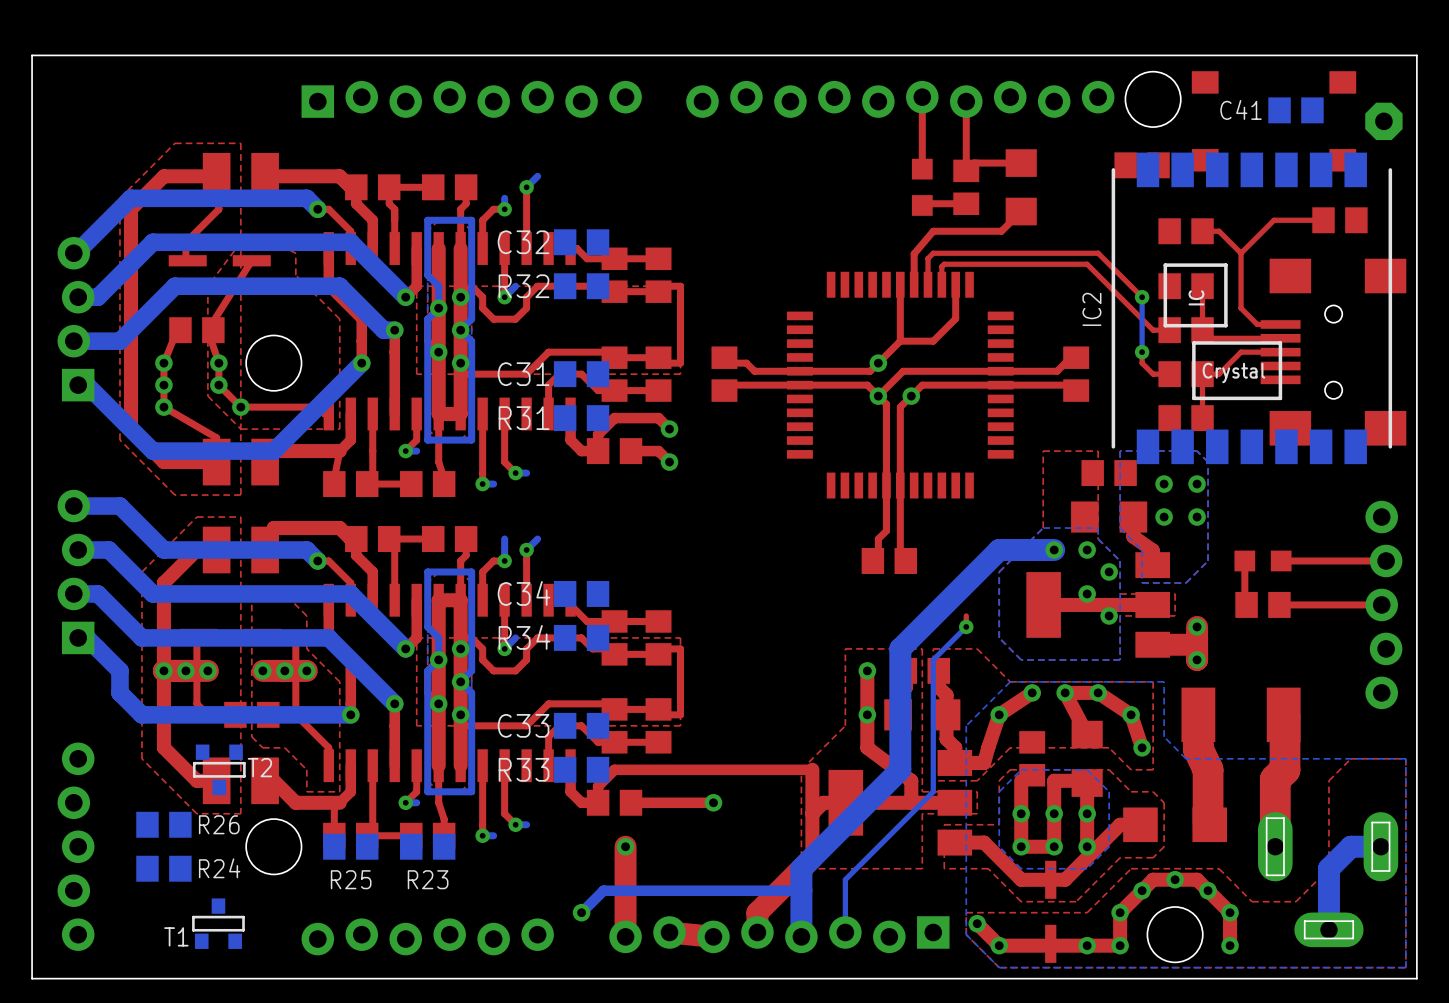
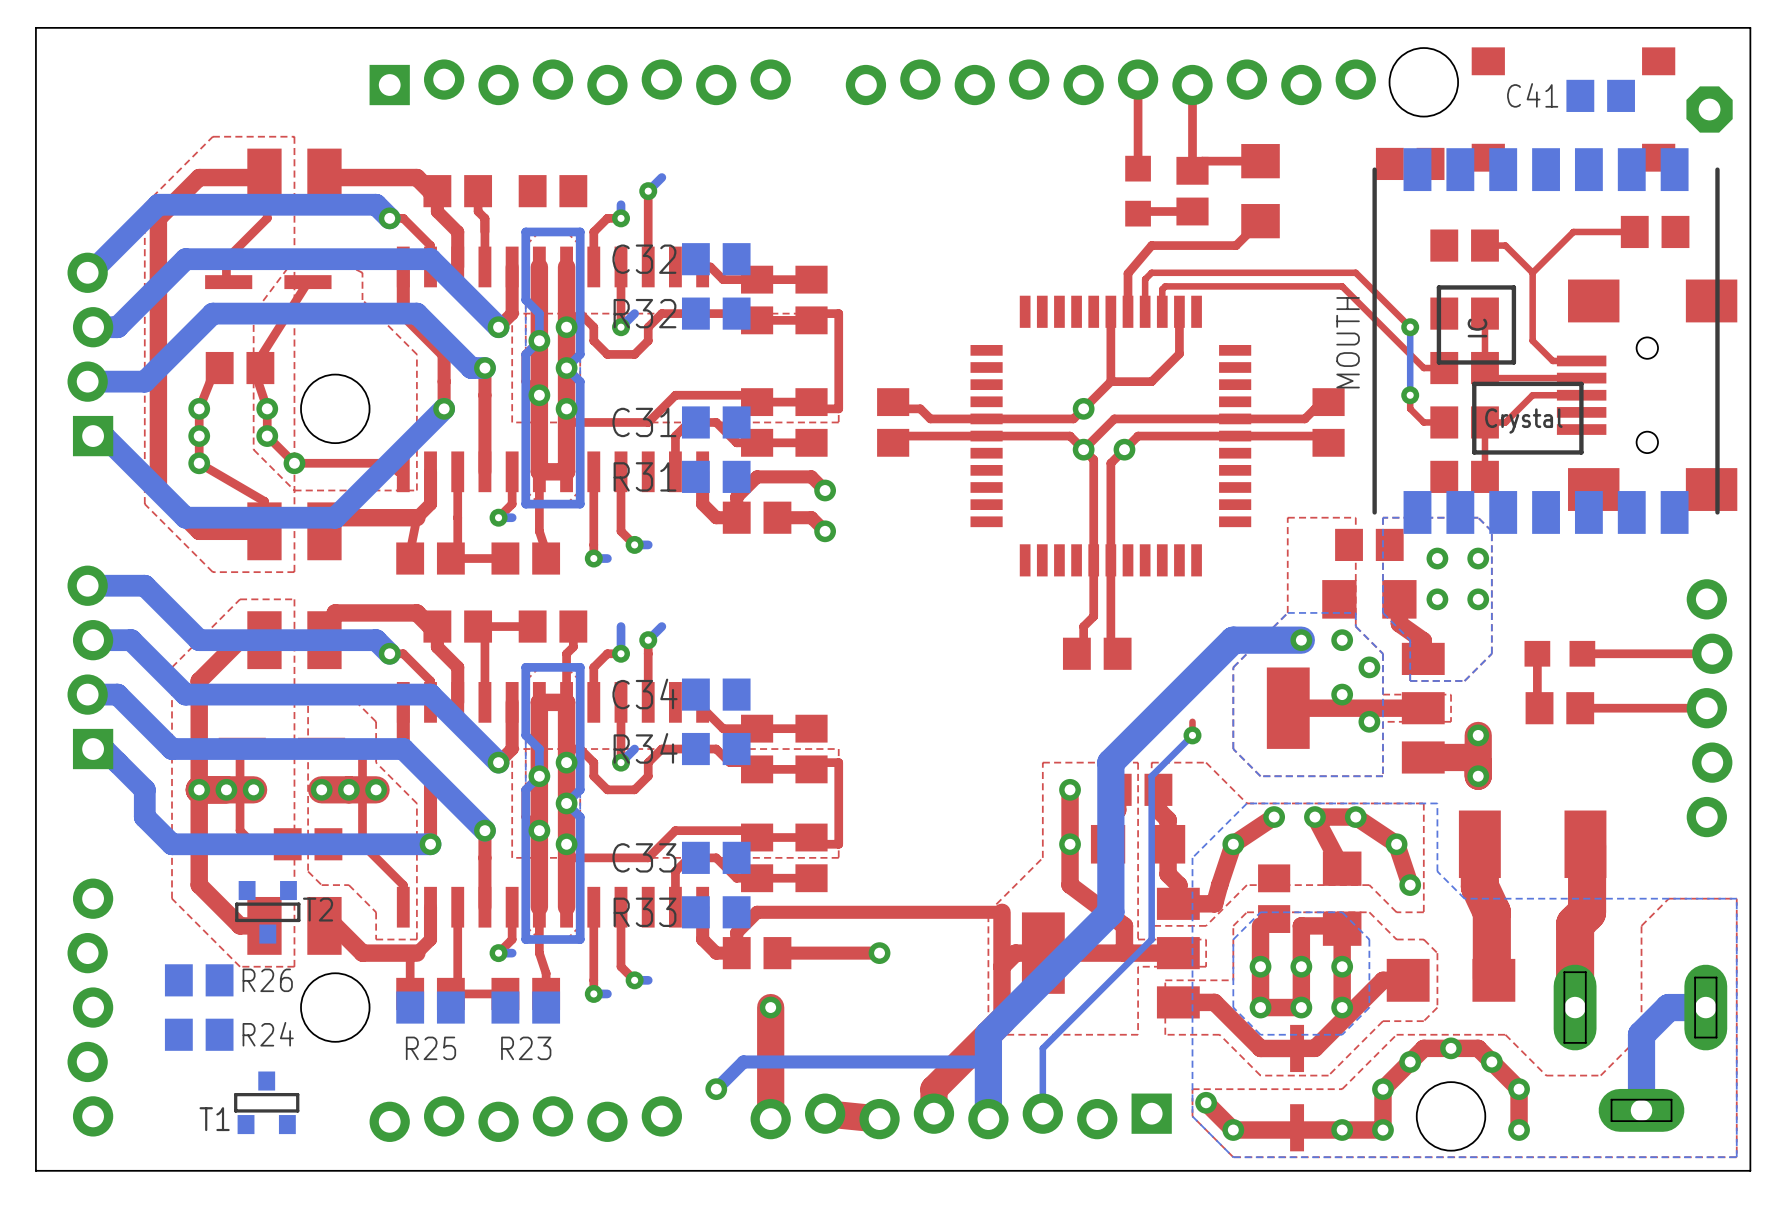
top track: (433, 187) (389, 187) -> none
top track: (466, 187) (466, 203) (460, 209) (460, 248) -> none
IC2 name: IC2 (1091, 309) -> MOUTH (1348, 342)

